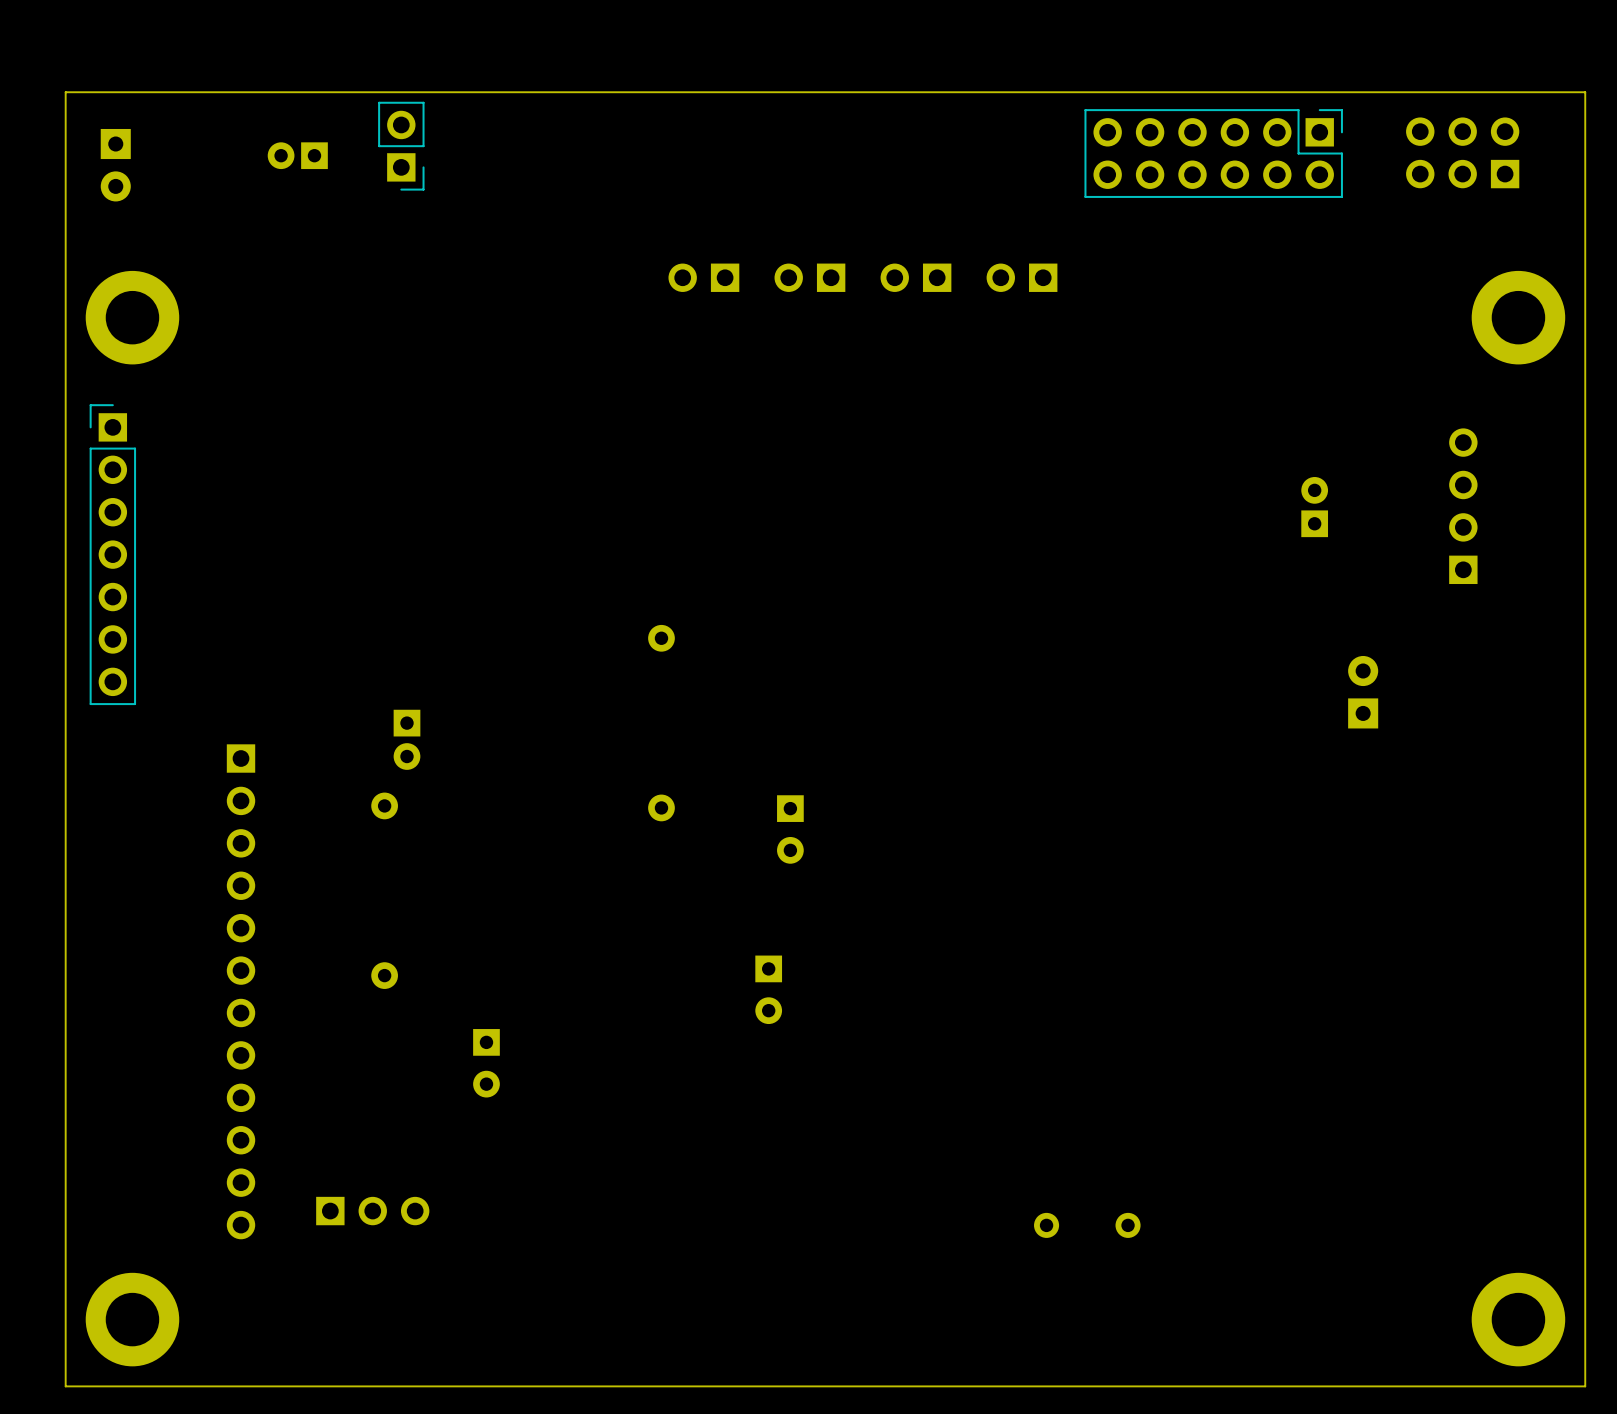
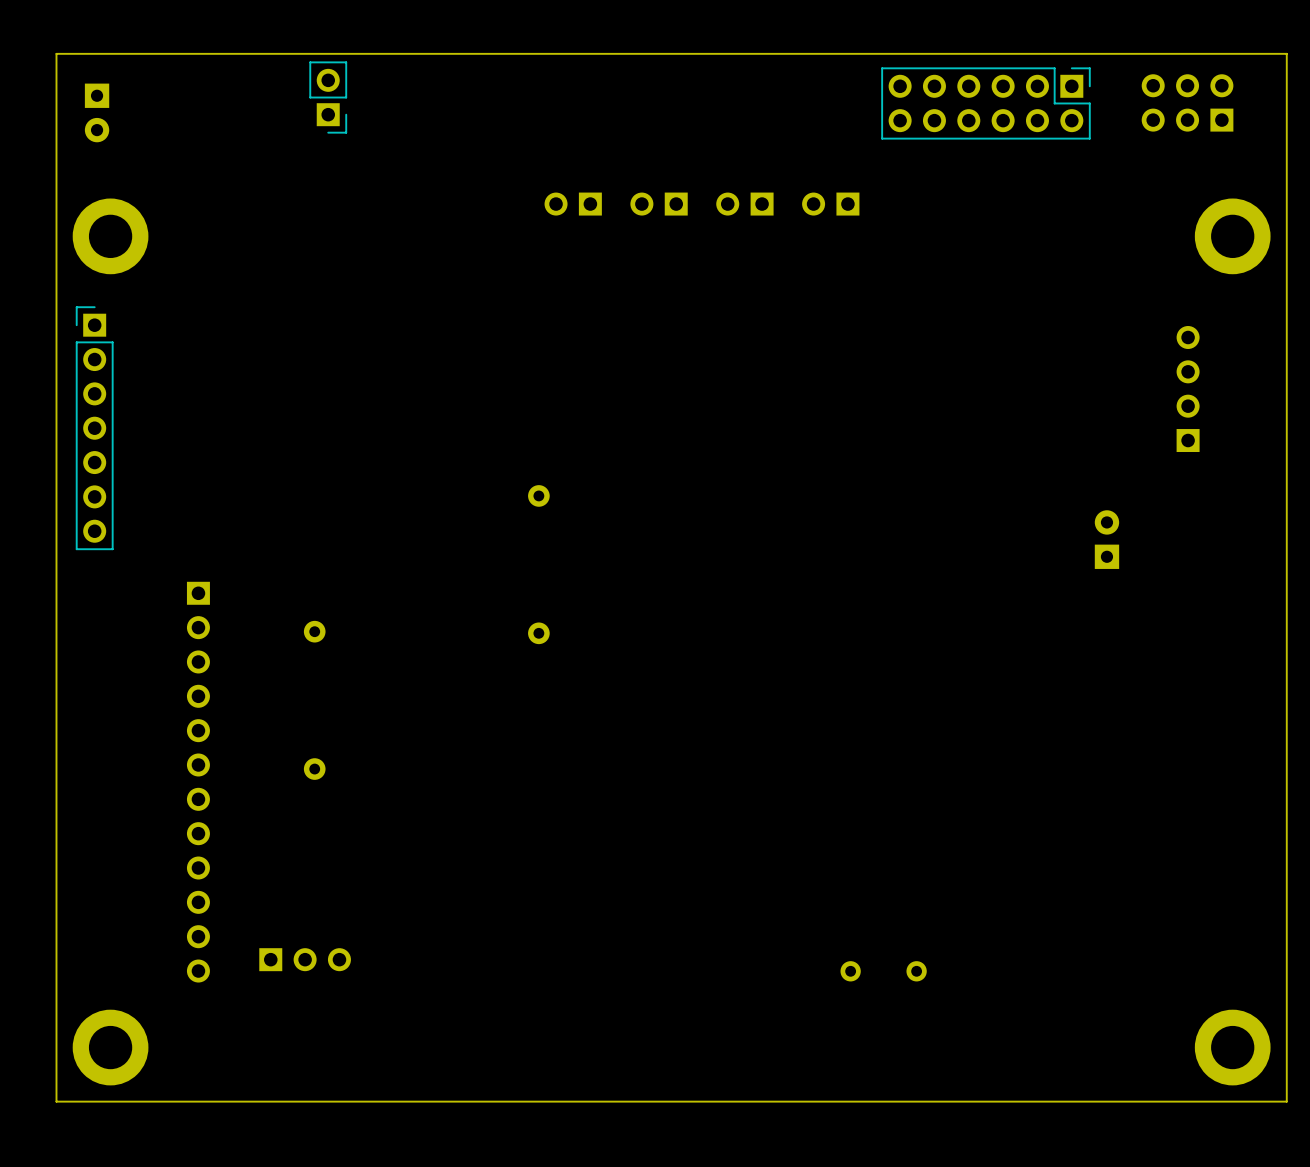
part: (297, 155) -> none
part: (1314, 507) -> none
part: (406, 739) -> none
part: (790, 829) -> none
part: (768, 989) -> none
part: (486, 1063) -> none

